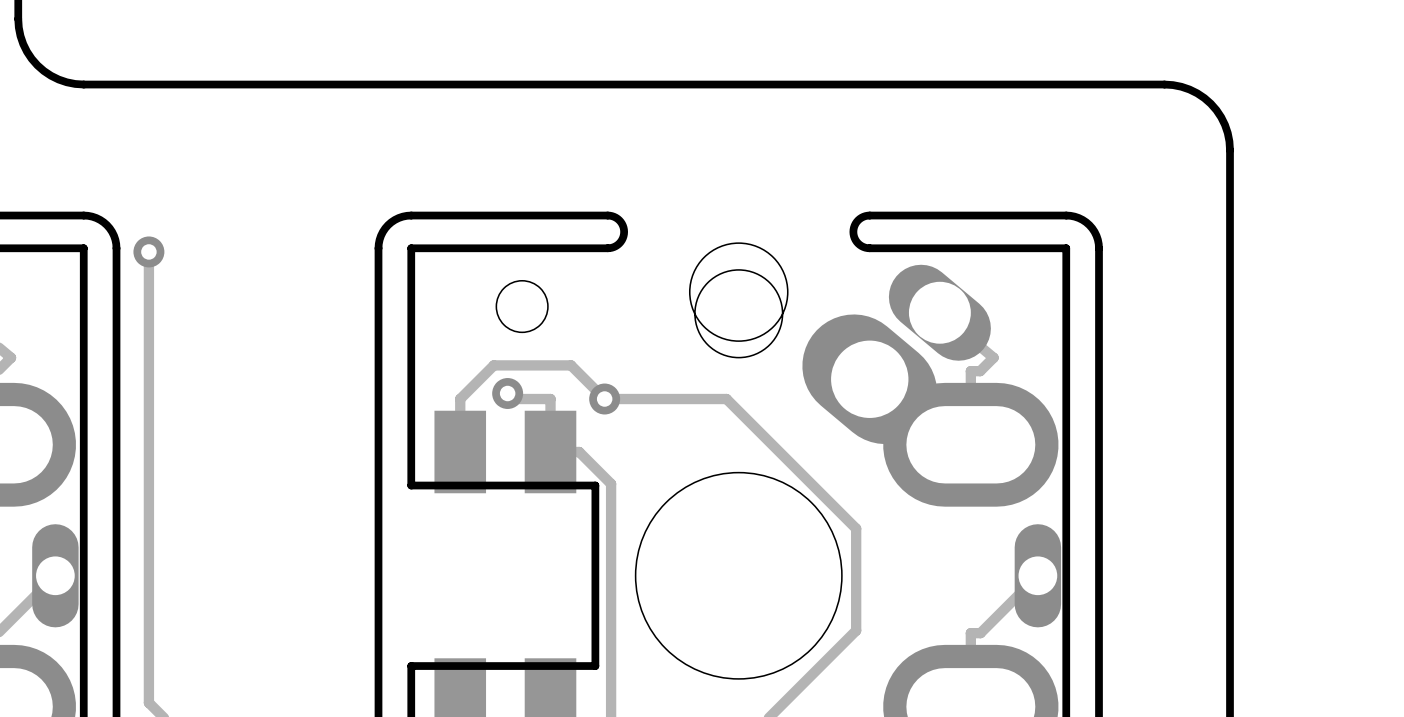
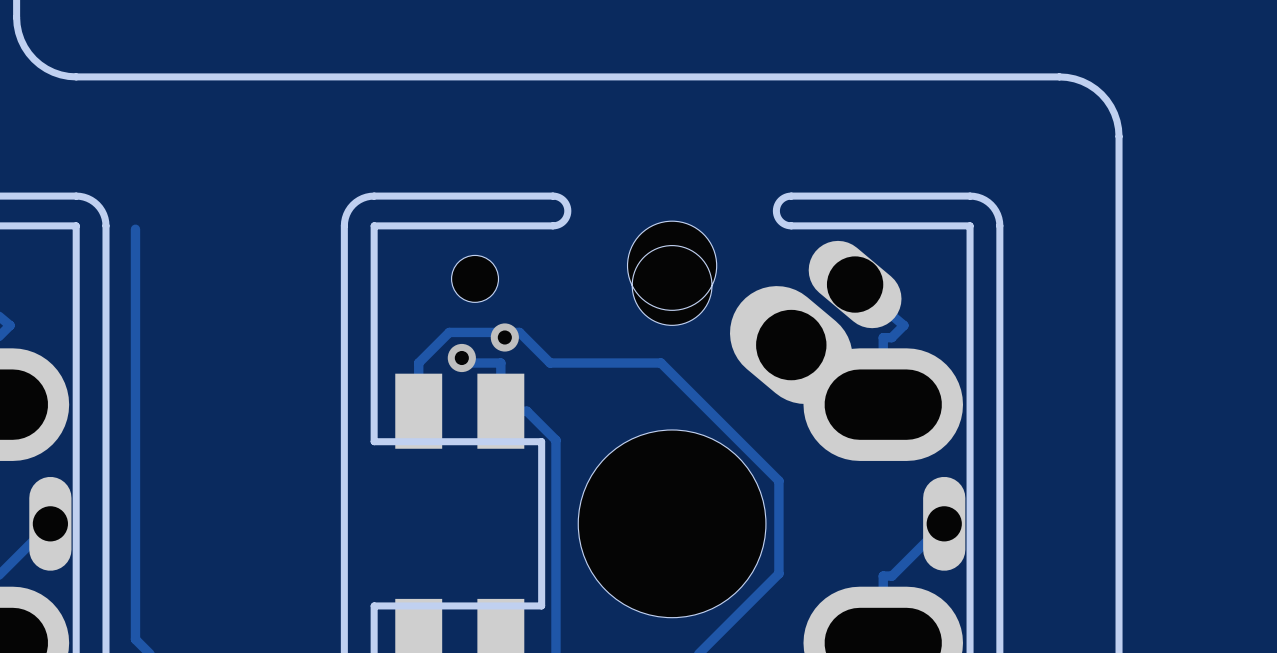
via: (148, 251) -> none
via position: (604, 399) -> (504, 337)

